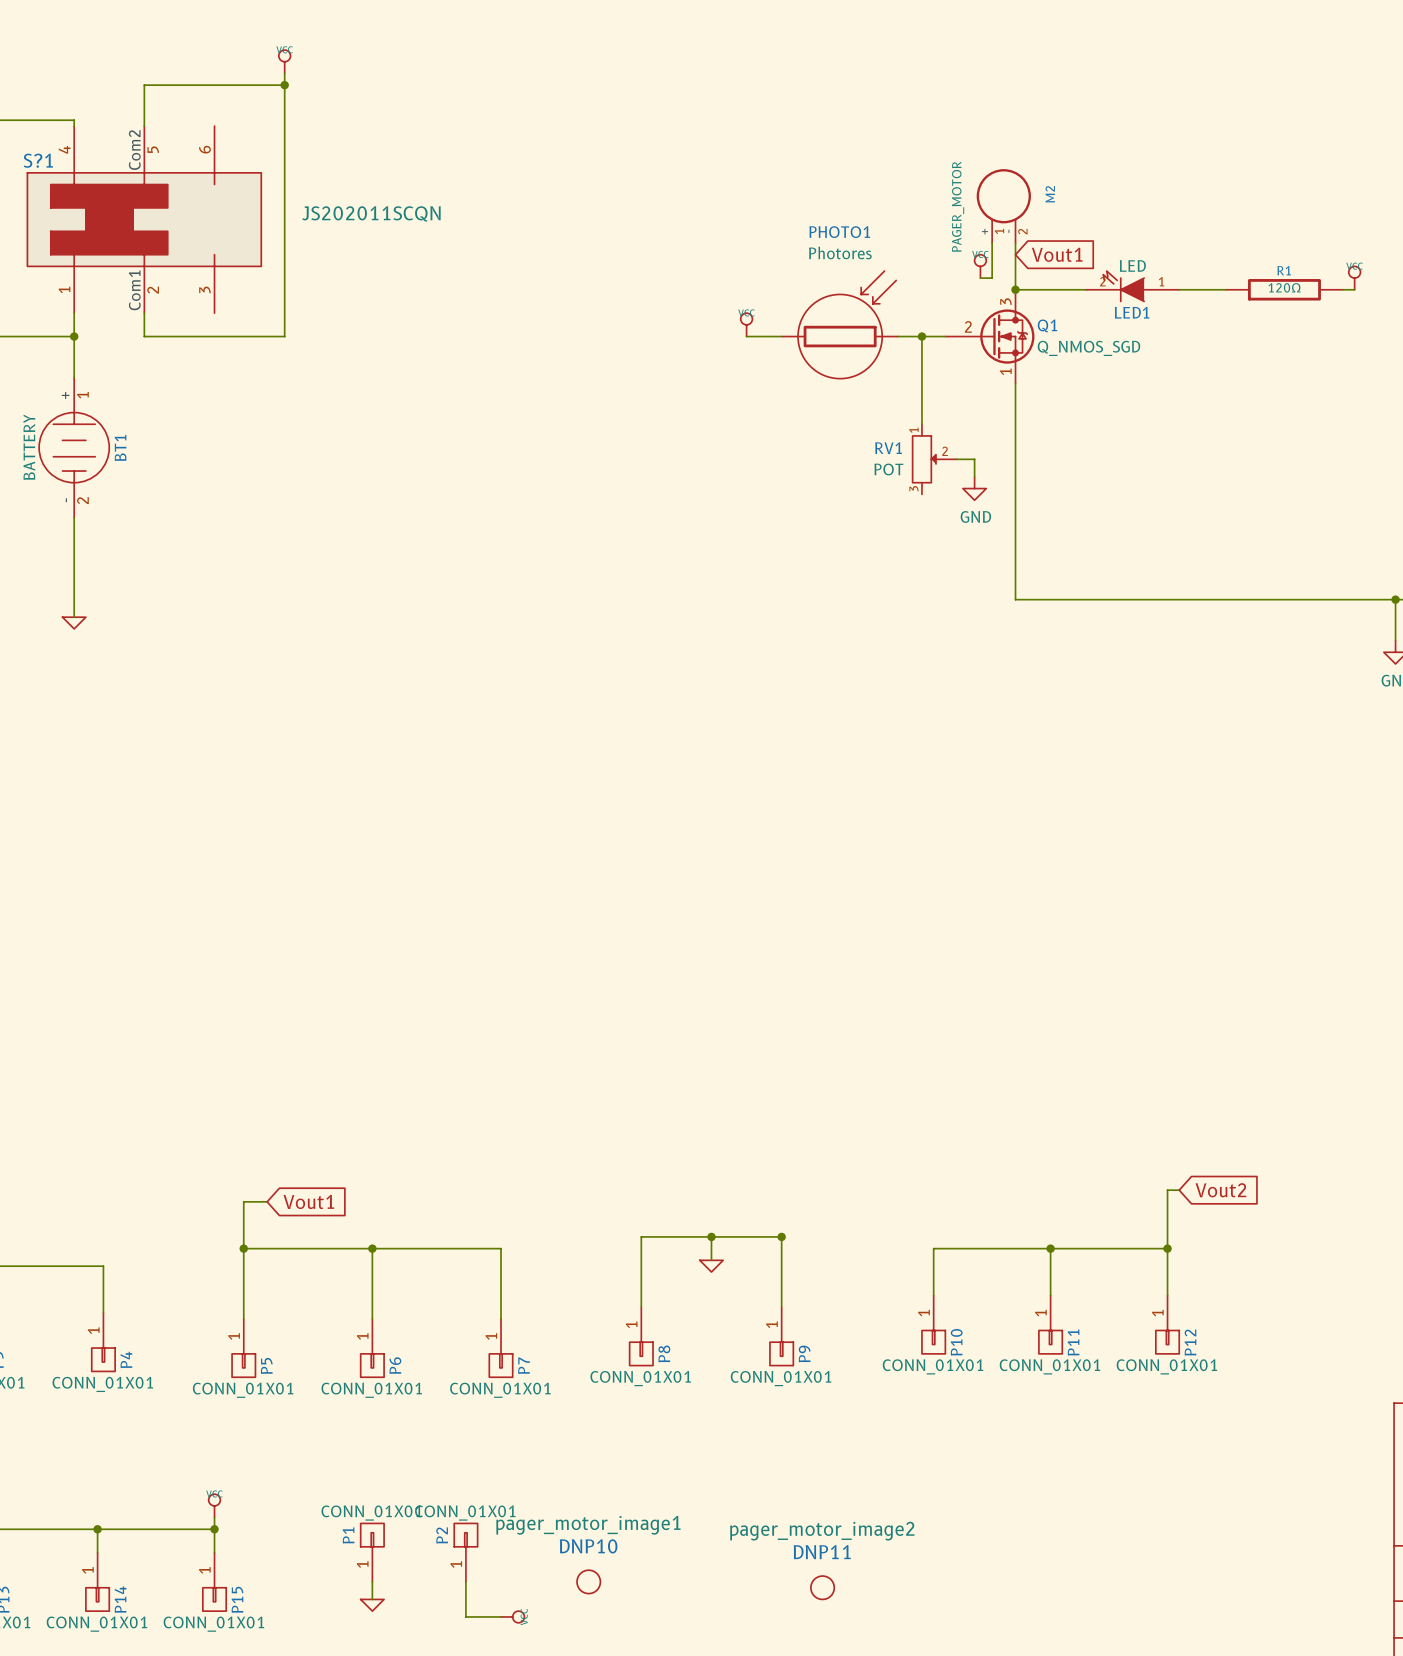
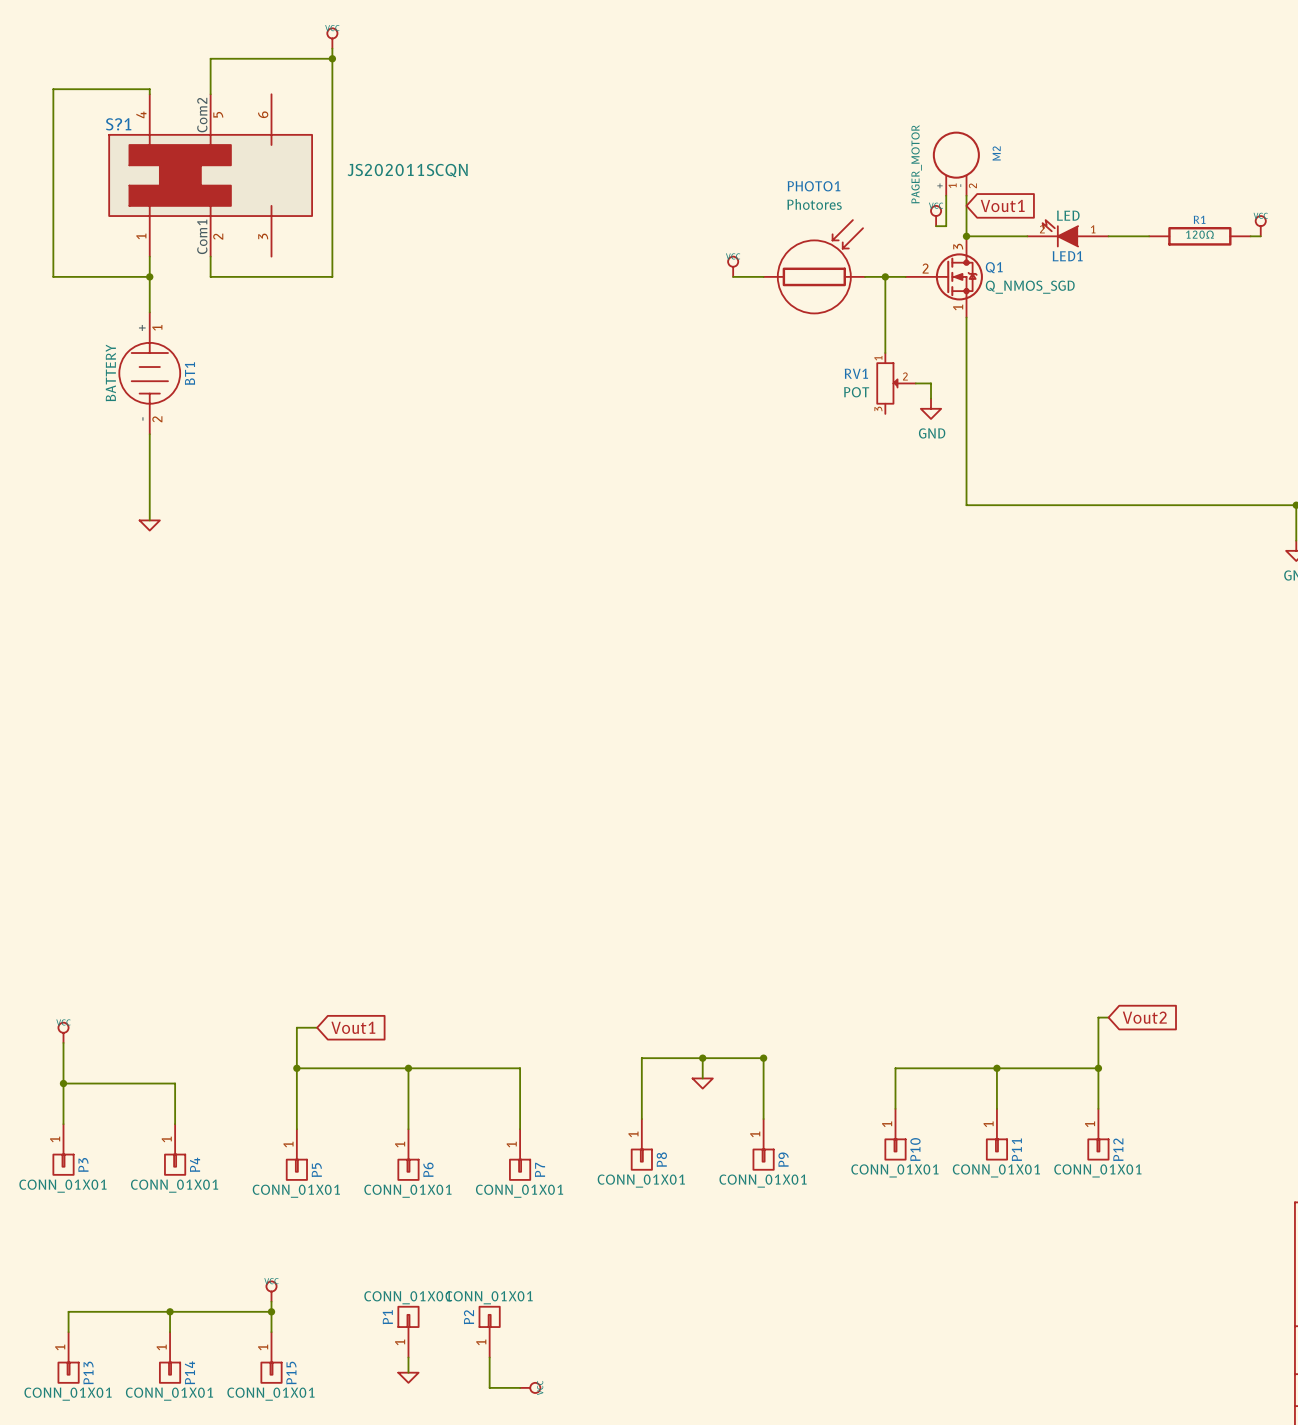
DNP10: pager_motor_image1 (588, 1581) -> none
DNP11: pager_motor_image2 (822, 1587) -> none

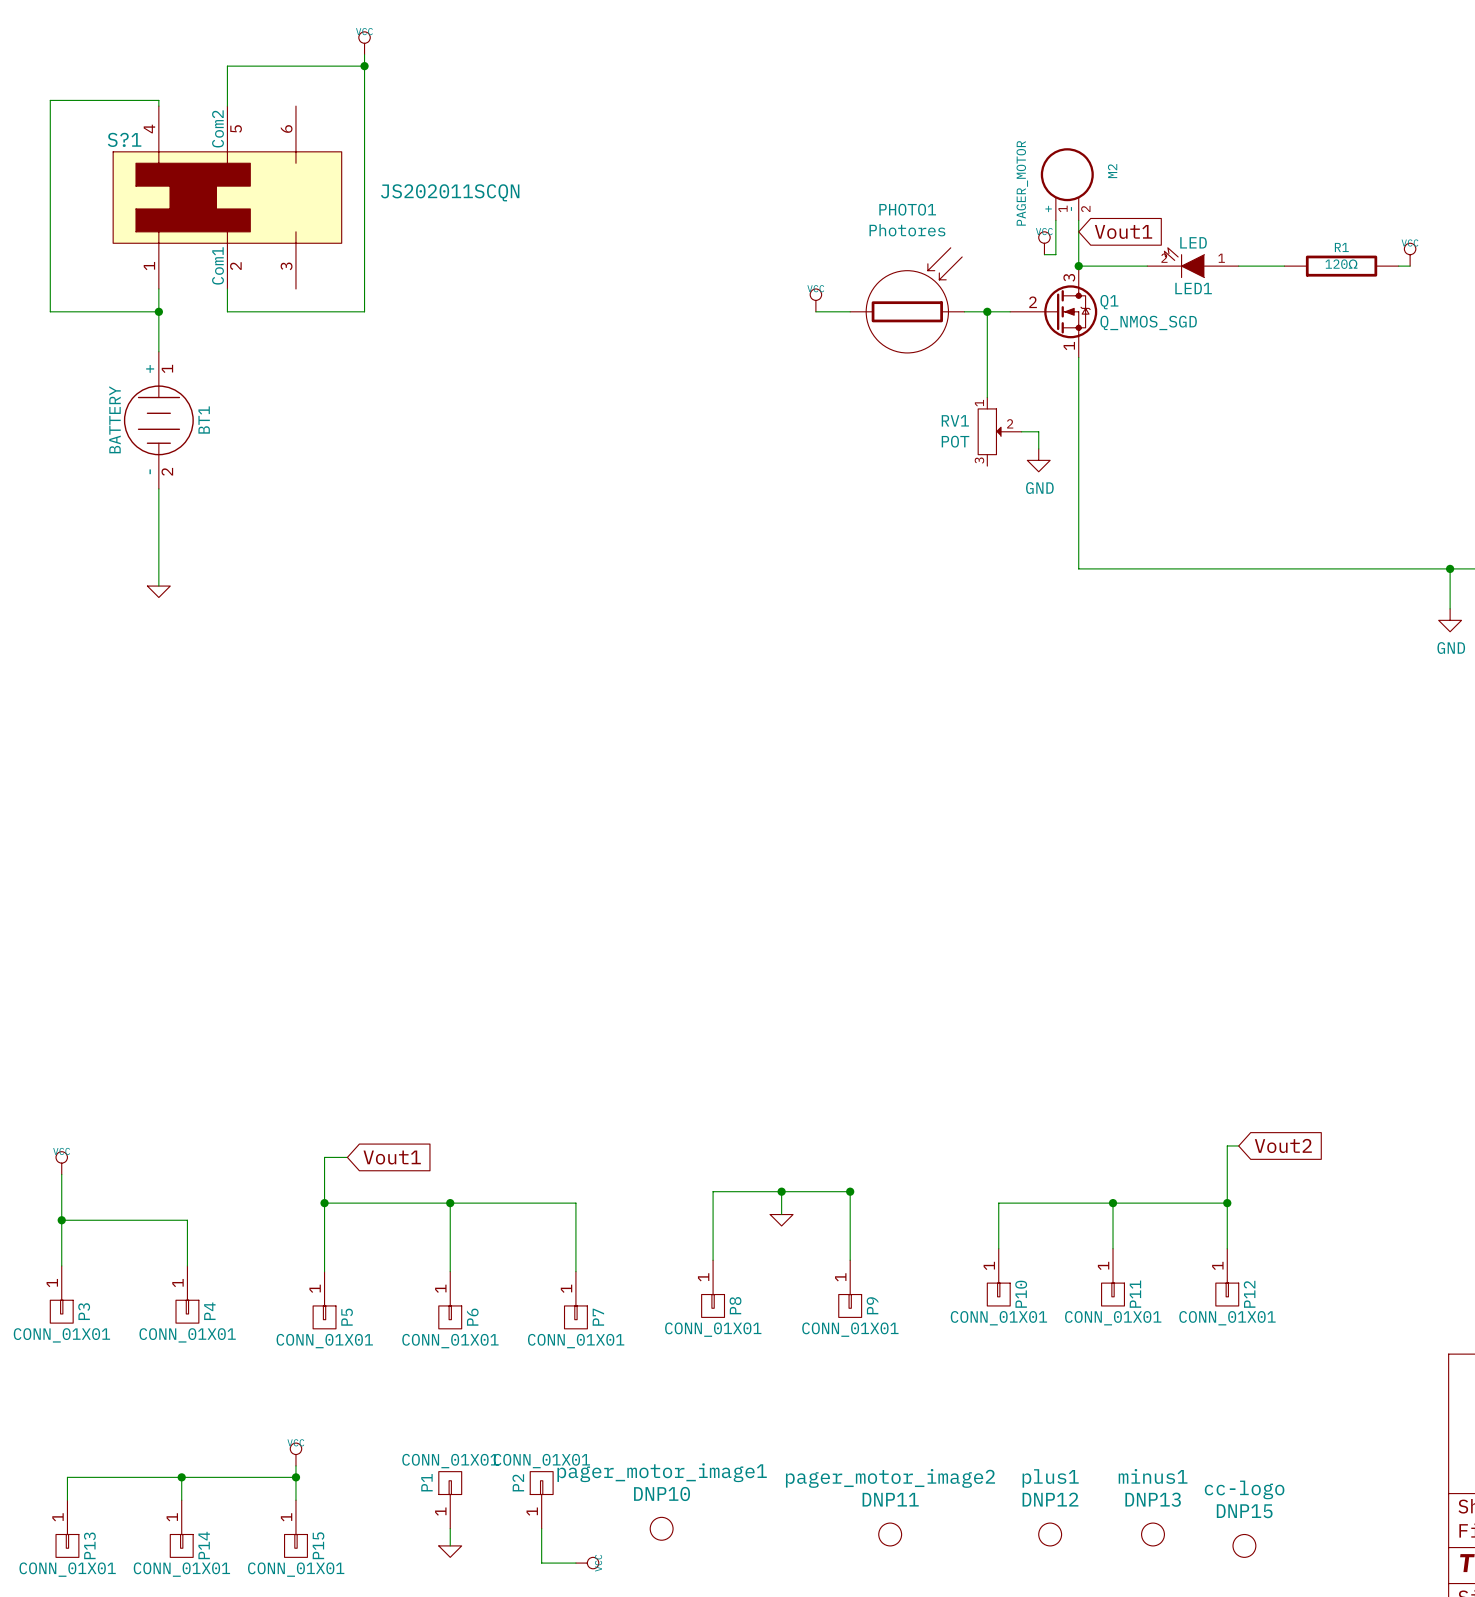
DNP10: none -> pager_motor_image1 (661, 1528)
DNP11: none -> pager_motor_image2 (890, 1534)
DNP12: none -> plus1 (1050, 1534)
DNP13: none -> minus1 (1153, 1534)
DNP15: none -> cc-logo (1244, 1545)

